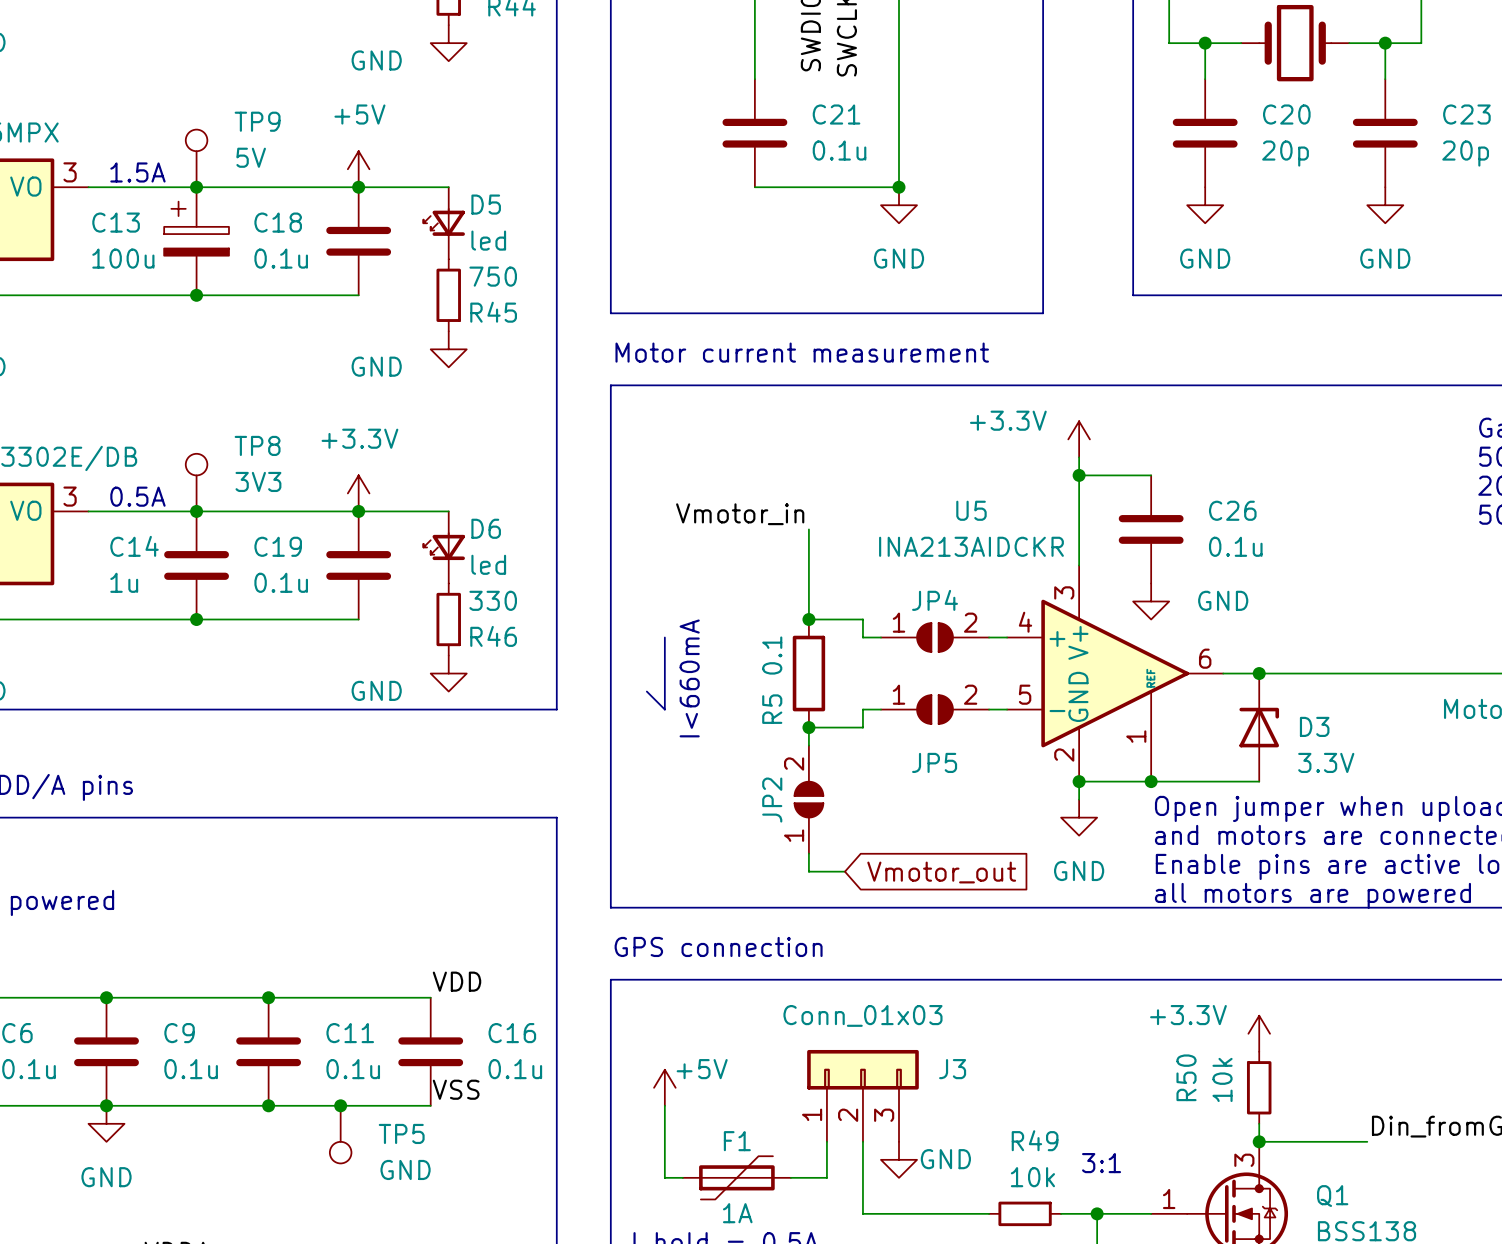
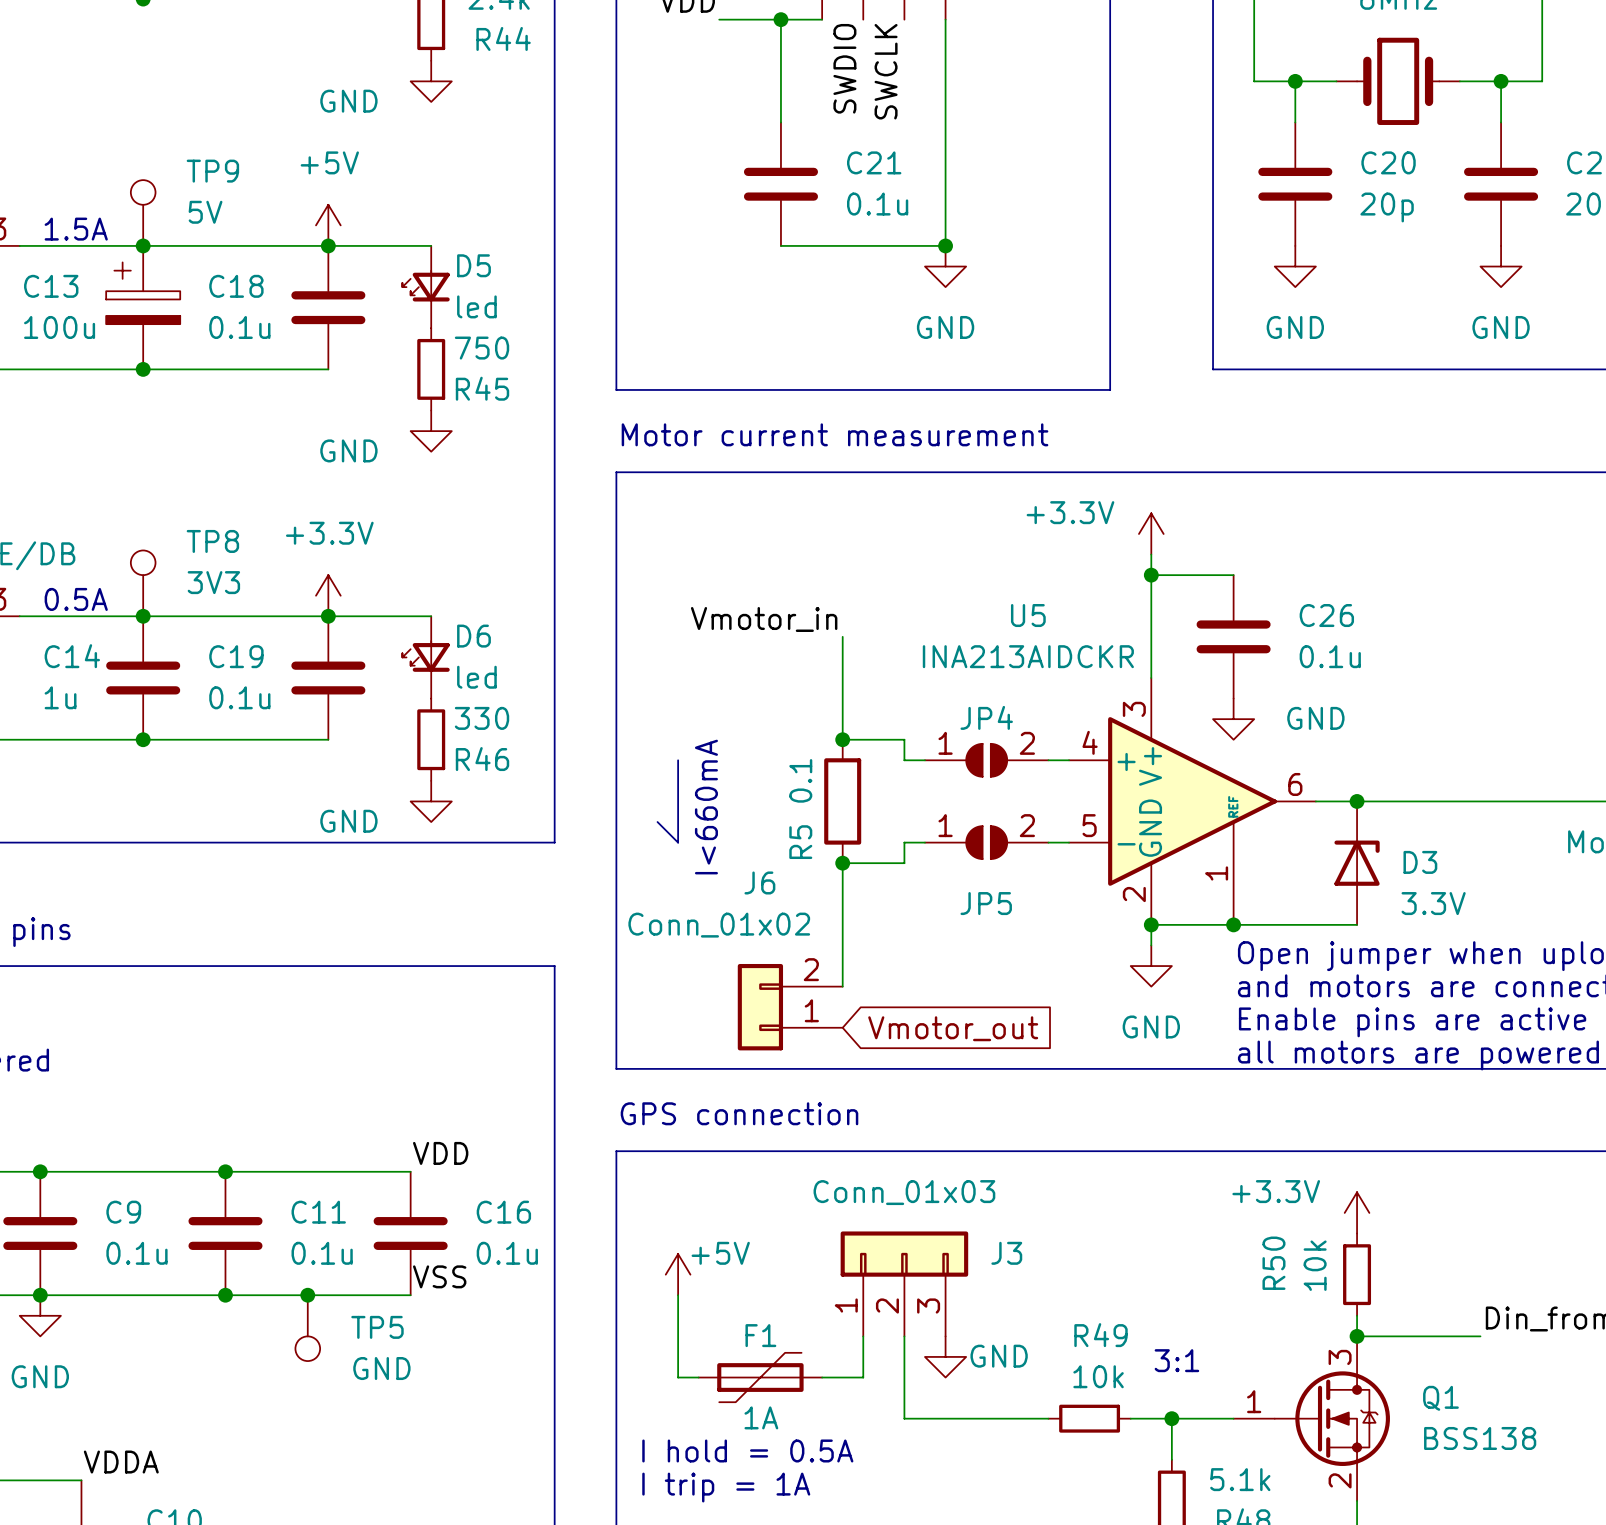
JP2: (808, 799) -> none
J6: none -> Conn_01x02 (790, 1007)
wire: (808, 853) (808, 871) (844, 871) -> none
global label position: Vmotor_out (941, 872) -> Vmotor_out (953, 1028)

